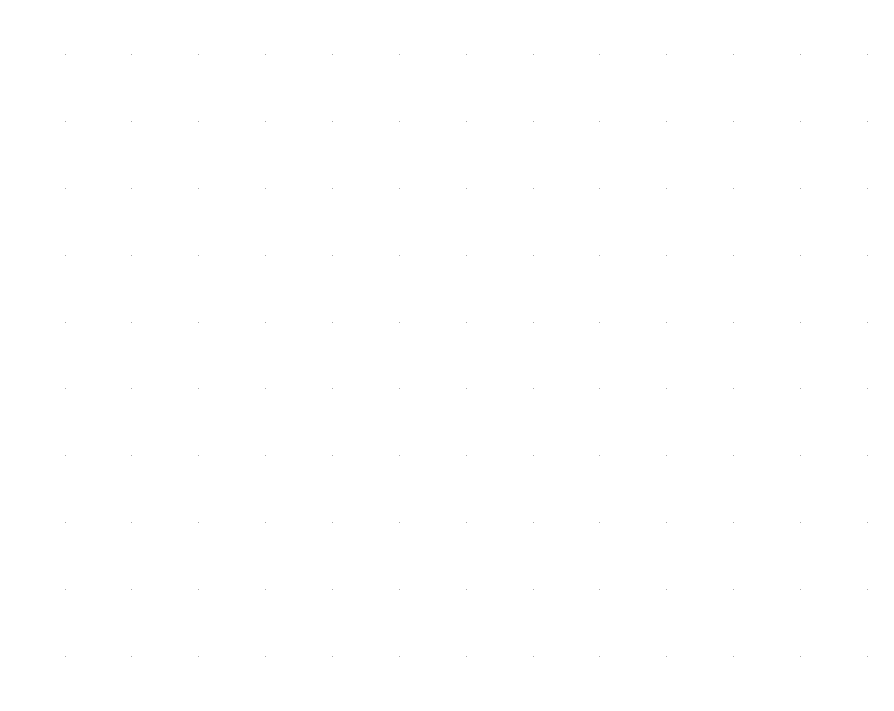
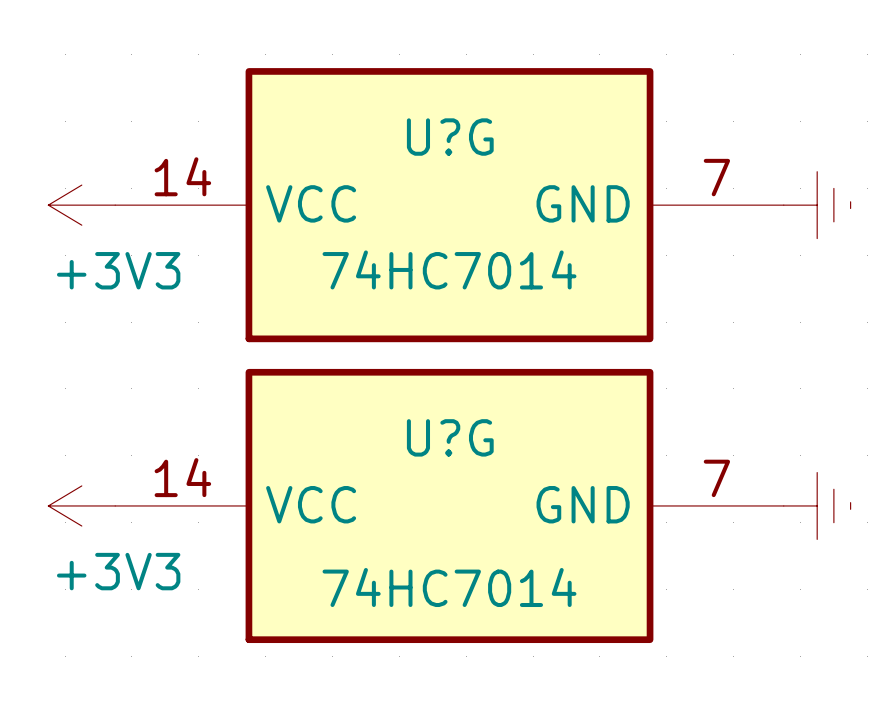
power symbol: none -> +3V3 (81, 205)
U?G: none -> 74HC7014 (449, 205)
power symbol: none -> (817, 205)
power symbol: none -> +3V3 (81, 505)
U?G: none -> 74HC7014 (449, 505)
power symbol: none -> (817, 505)

